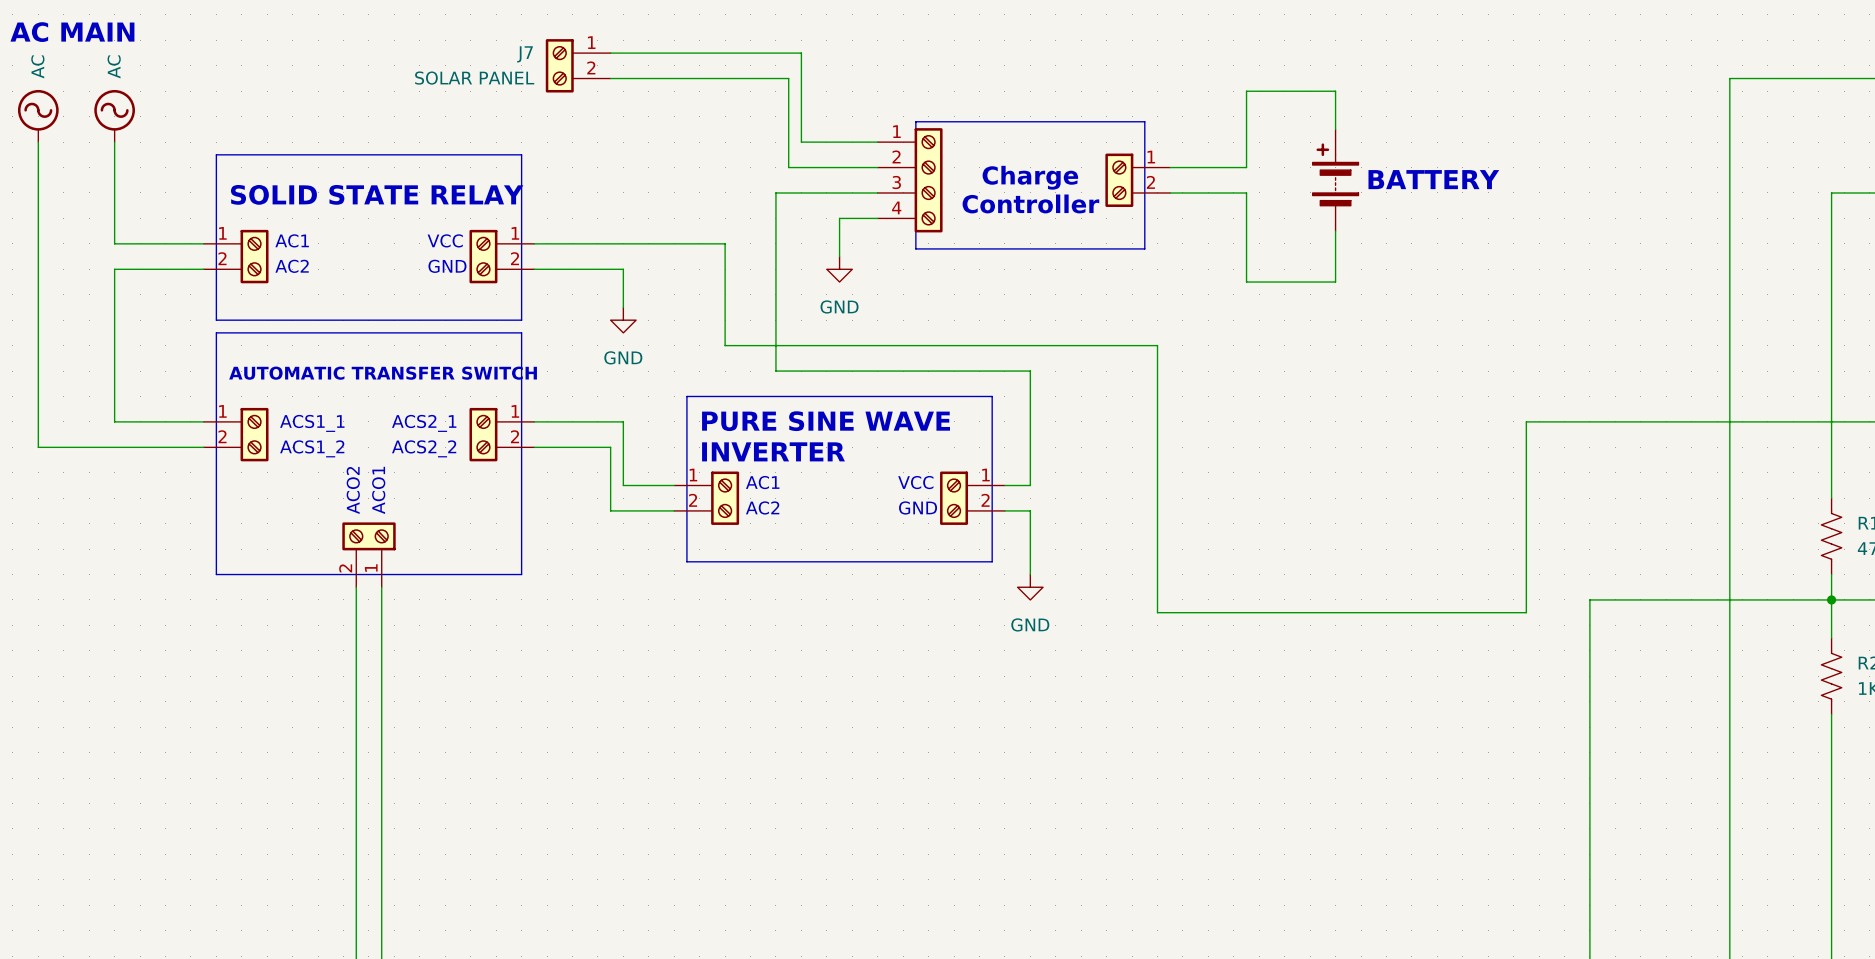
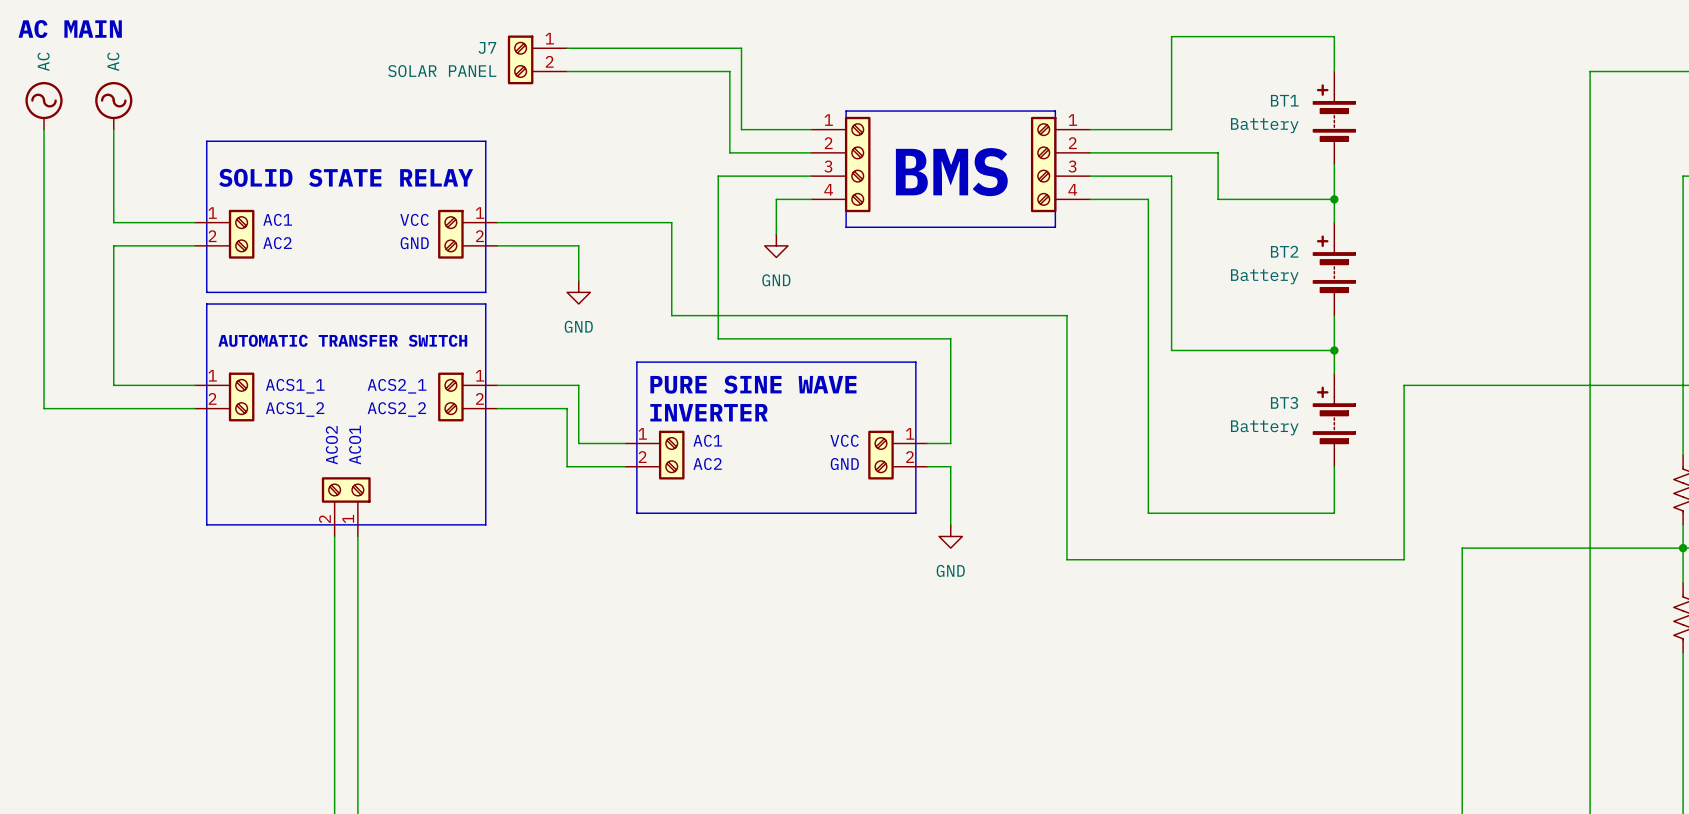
wire: none -> (1334, 71) (1334, 36) (1171, 36) (1171, 129) (1090, 129)
wire: (1335, 129) (1335, 91) (1246, 91) (1246, 167) -> (1334, 199) (1218, 199) (1218, 152) (1148, 152)
BT1: none -> Battery (1334, 118)
text: Charge (1030, 177) -> none
text: BATTERY (1433, 179) -> none
part: (1137, 180) -> none
part: none -> (1060, 164)
part: (1335, 180) -> none
wire: none -> (1334, 164) (1334, 222)
text: none -> BMS (951, 172)
wire: (1246, 192) (1246, 218) -> (1090, 199) (1148, 199)
wire: none -> (1148, 176) (1171, 176) (1171, 350) (1334, 350)
text: Controller (1030, 203) -> none
junction: none -> (1334, 199)
wire: (1335, 231) (1335, 282) (1246, 282) -> (1334, 466) (1334, 513) (1148, 513) (1148, 257)
BT2: none -> Battery (1334, 269)
wire: none -> (1334, 315) (1334, 373)
junction: none -> (1334, 350)
BT3: none -> Battery (1334, 420)

